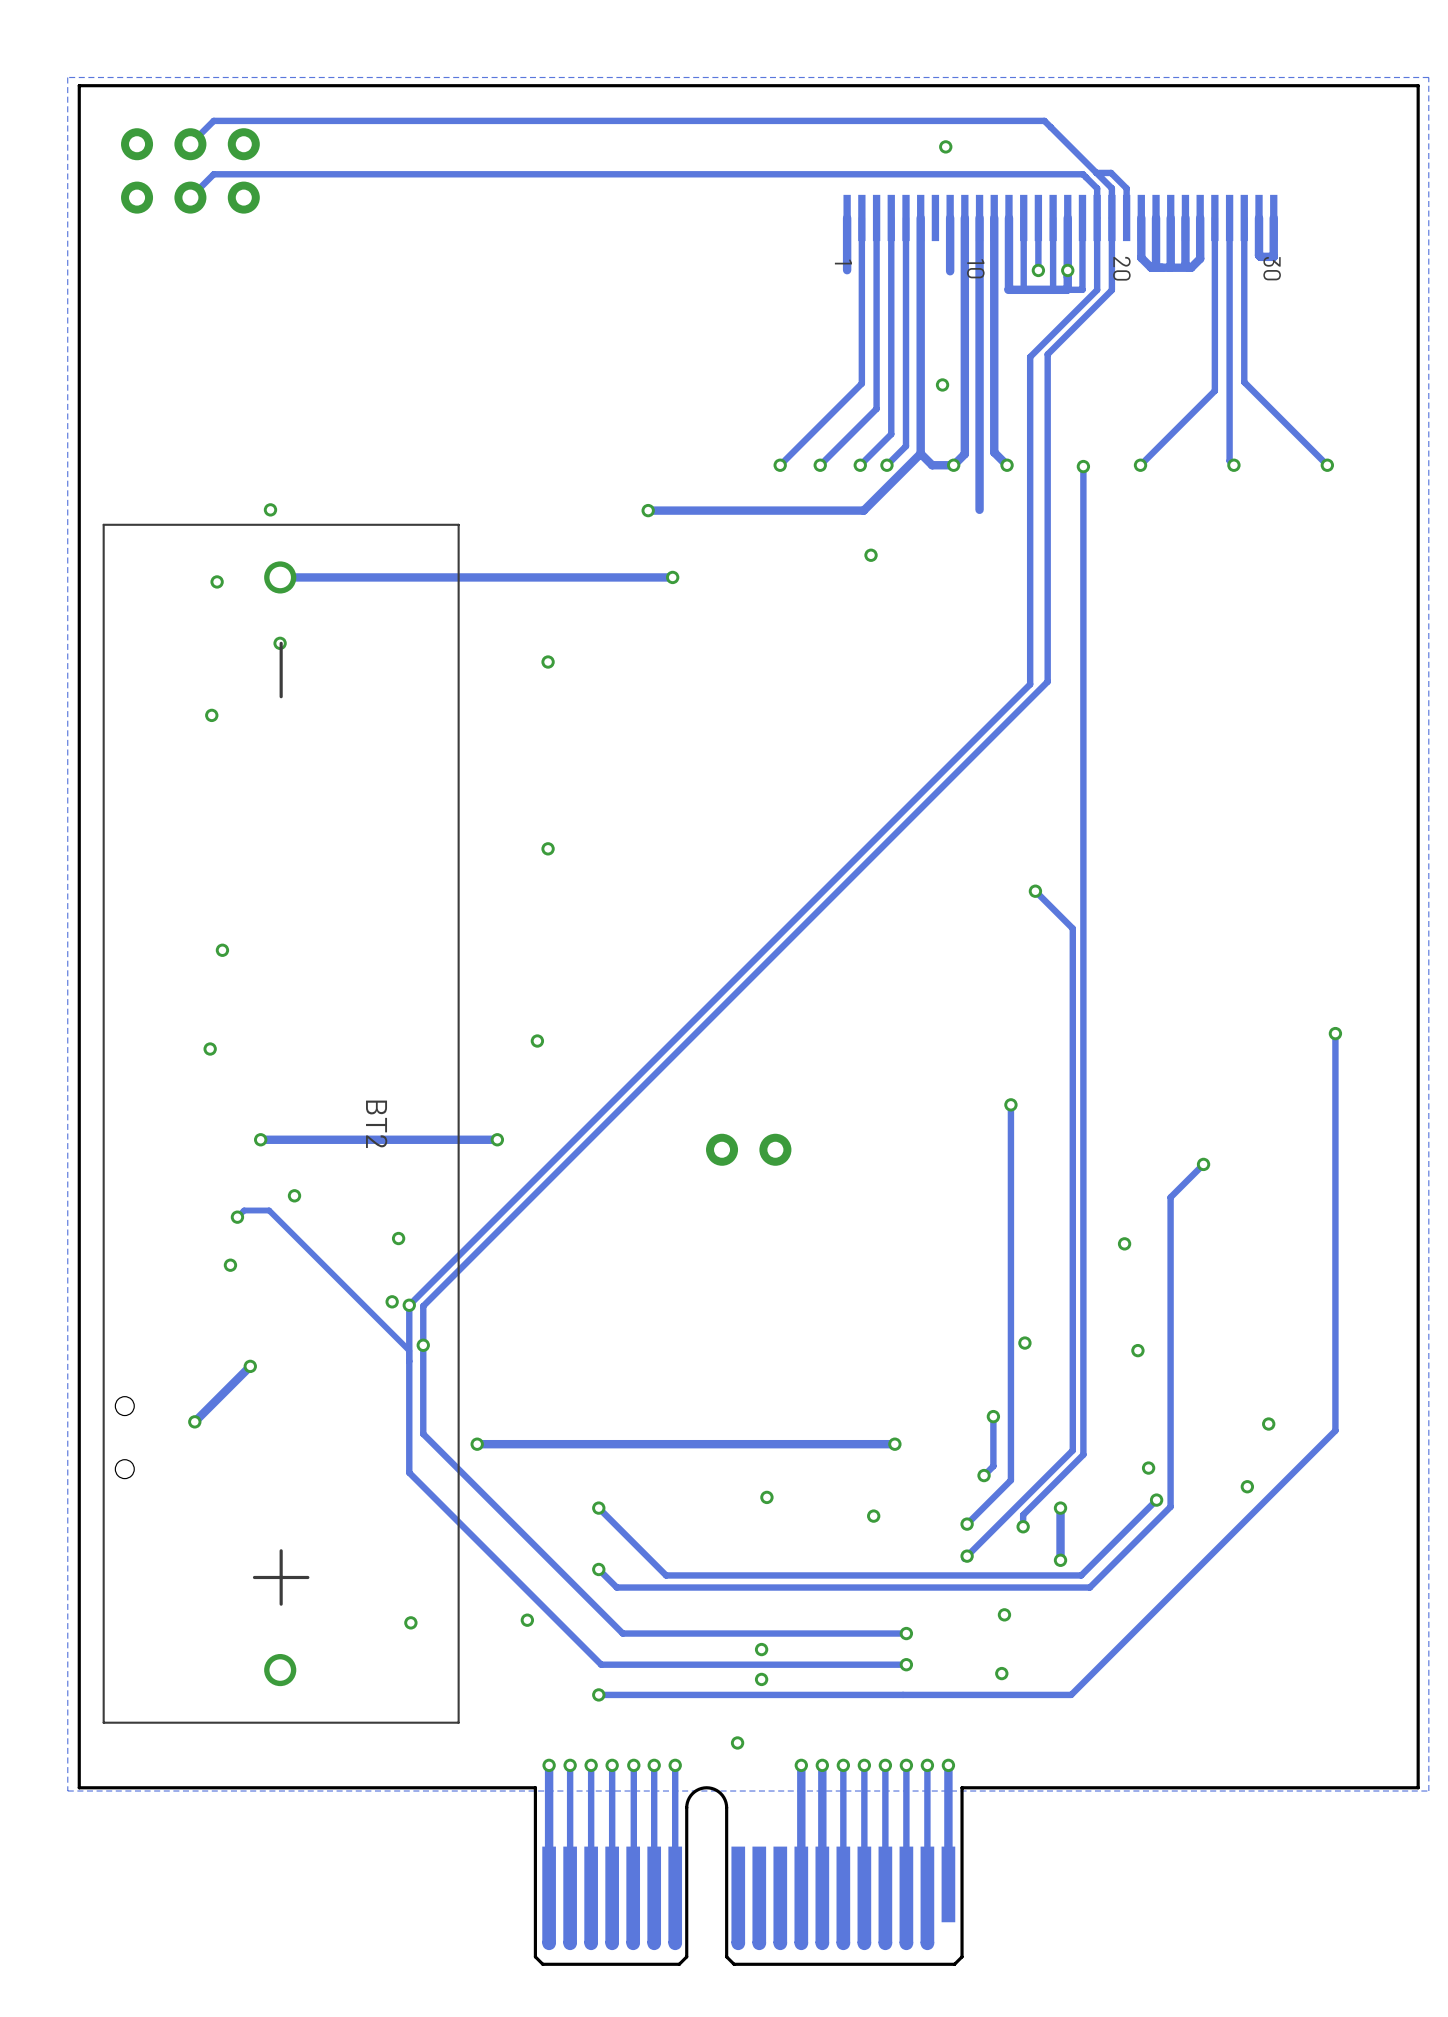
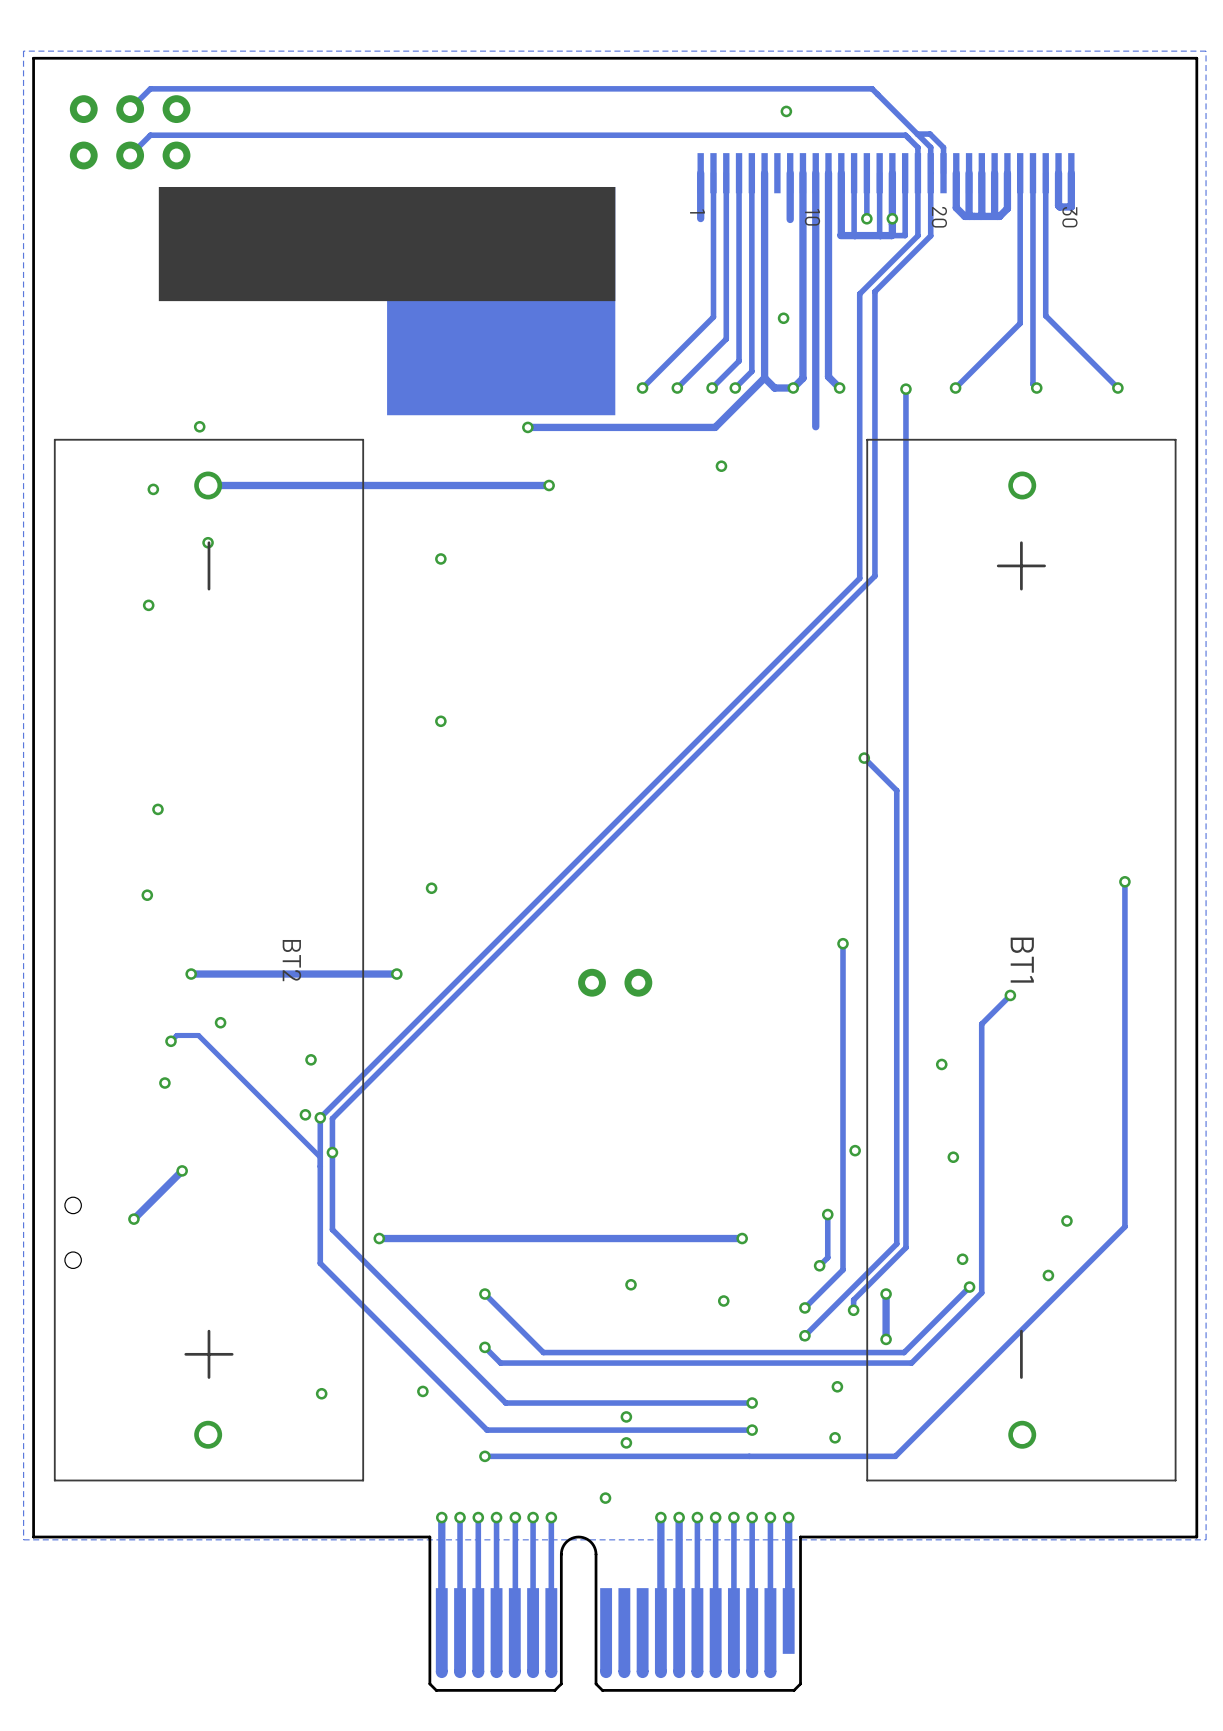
drawing: none -> [158, 186, 616, 416]
BT1: none -> (1021, 960)

